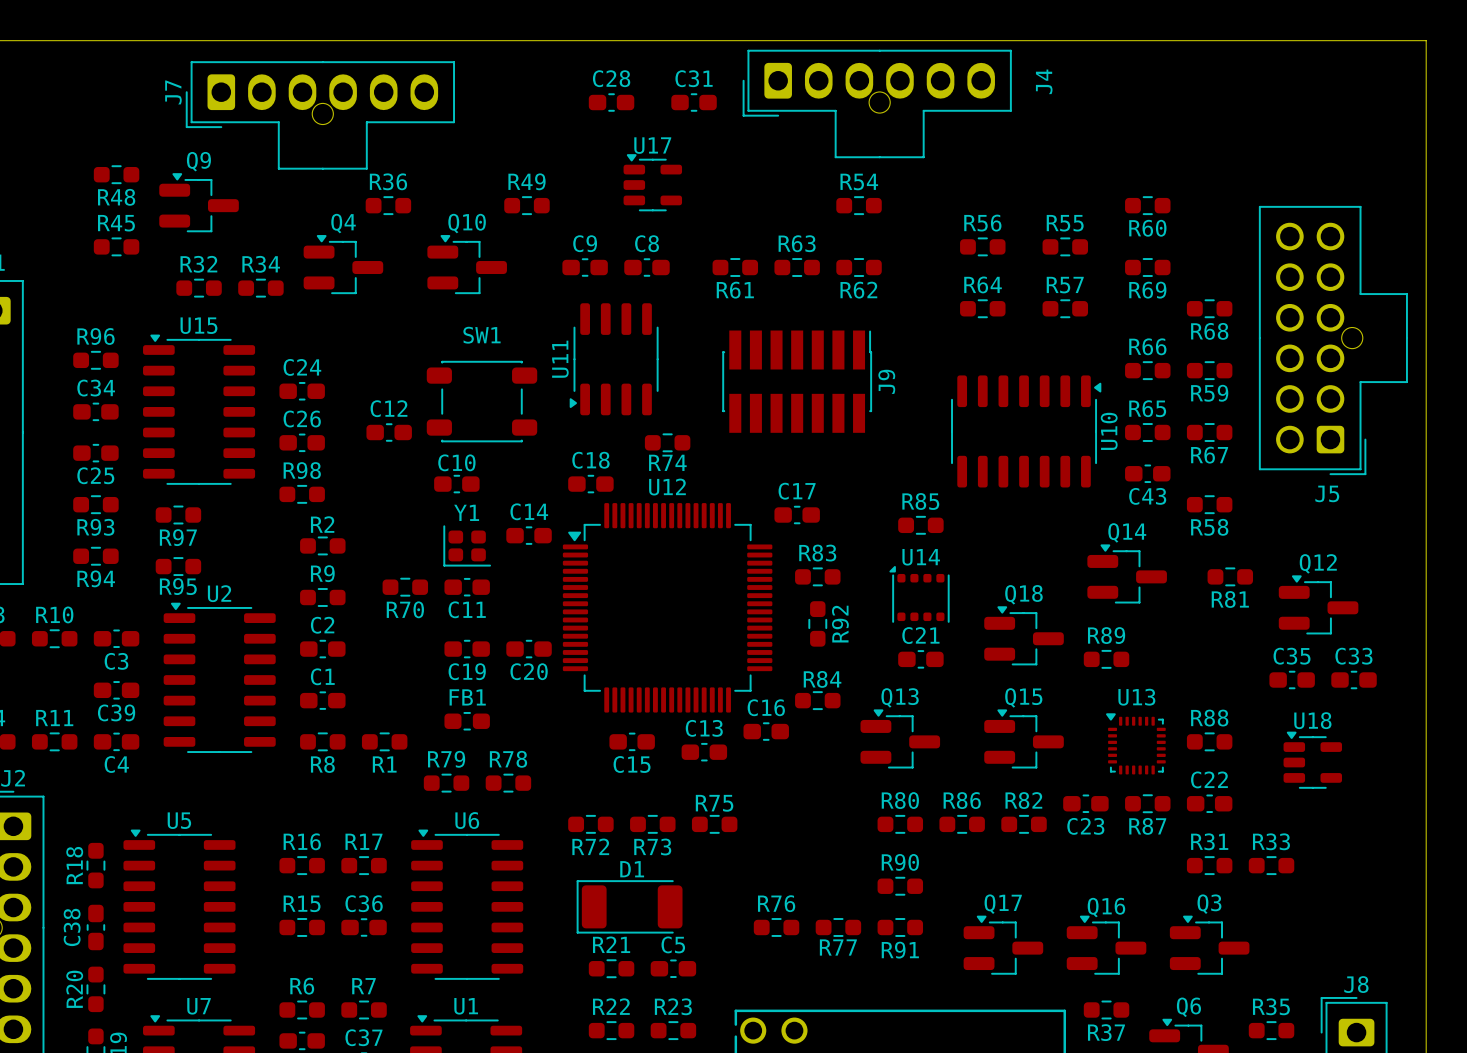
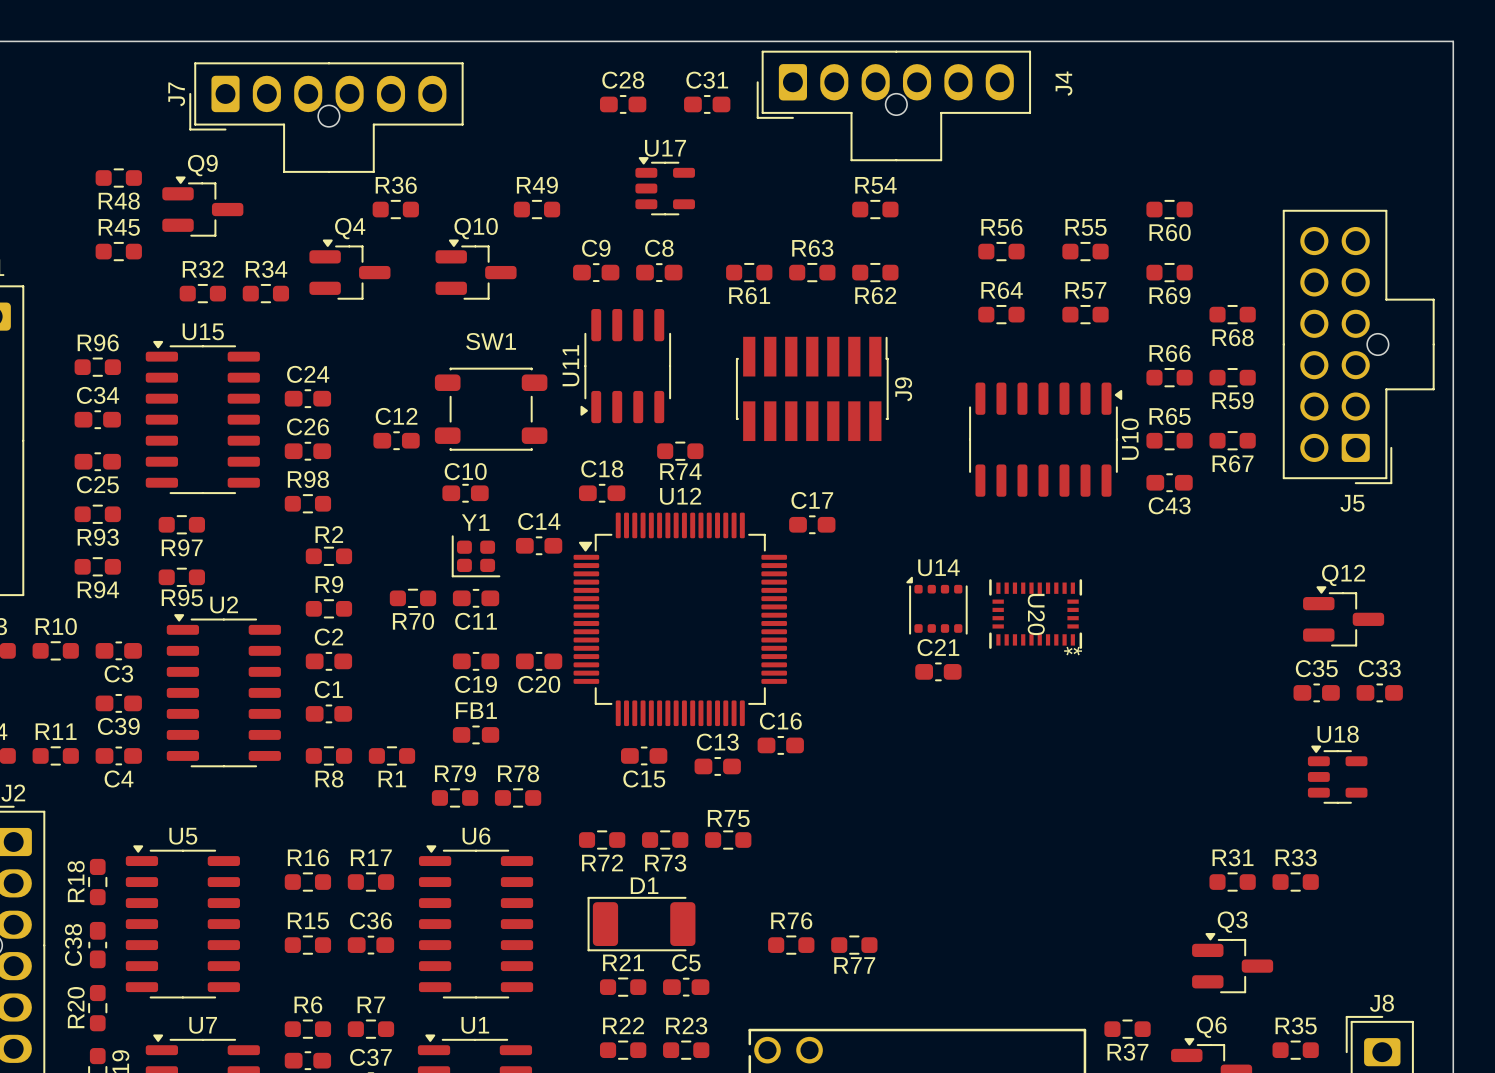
R58: (1209, 504) -> none
R85: (920, 525) -> none
Q14: (1127, 573) -> none
R83: (817, 576) -> none
R81: (1230, 576) -> none
U20: none -> (1035, 614)
R92: (817, 623) -> none
Q18: (1024, 635) -> none
R89: (1106, 659) -> none
R84: (817, 700) -> none
Q13: (900, 738) -> none
Q15: (1024, 738) -> none
R88: (1209, 741) -> none
U13: (1135, 743) -> none
C23: (1085, 803) -> none
R87: (1147, 803) -> none
C22: (1209, 803) -> none
R80: (900, 824) -> none
R86: (962, 824) -> none
R82: (1024, 824) -> none
R90: (900, 886) -> none
R91: (900, 927) -> none
Q17: (1003, 945) -> none
Q16: (1106, 945) -> none

